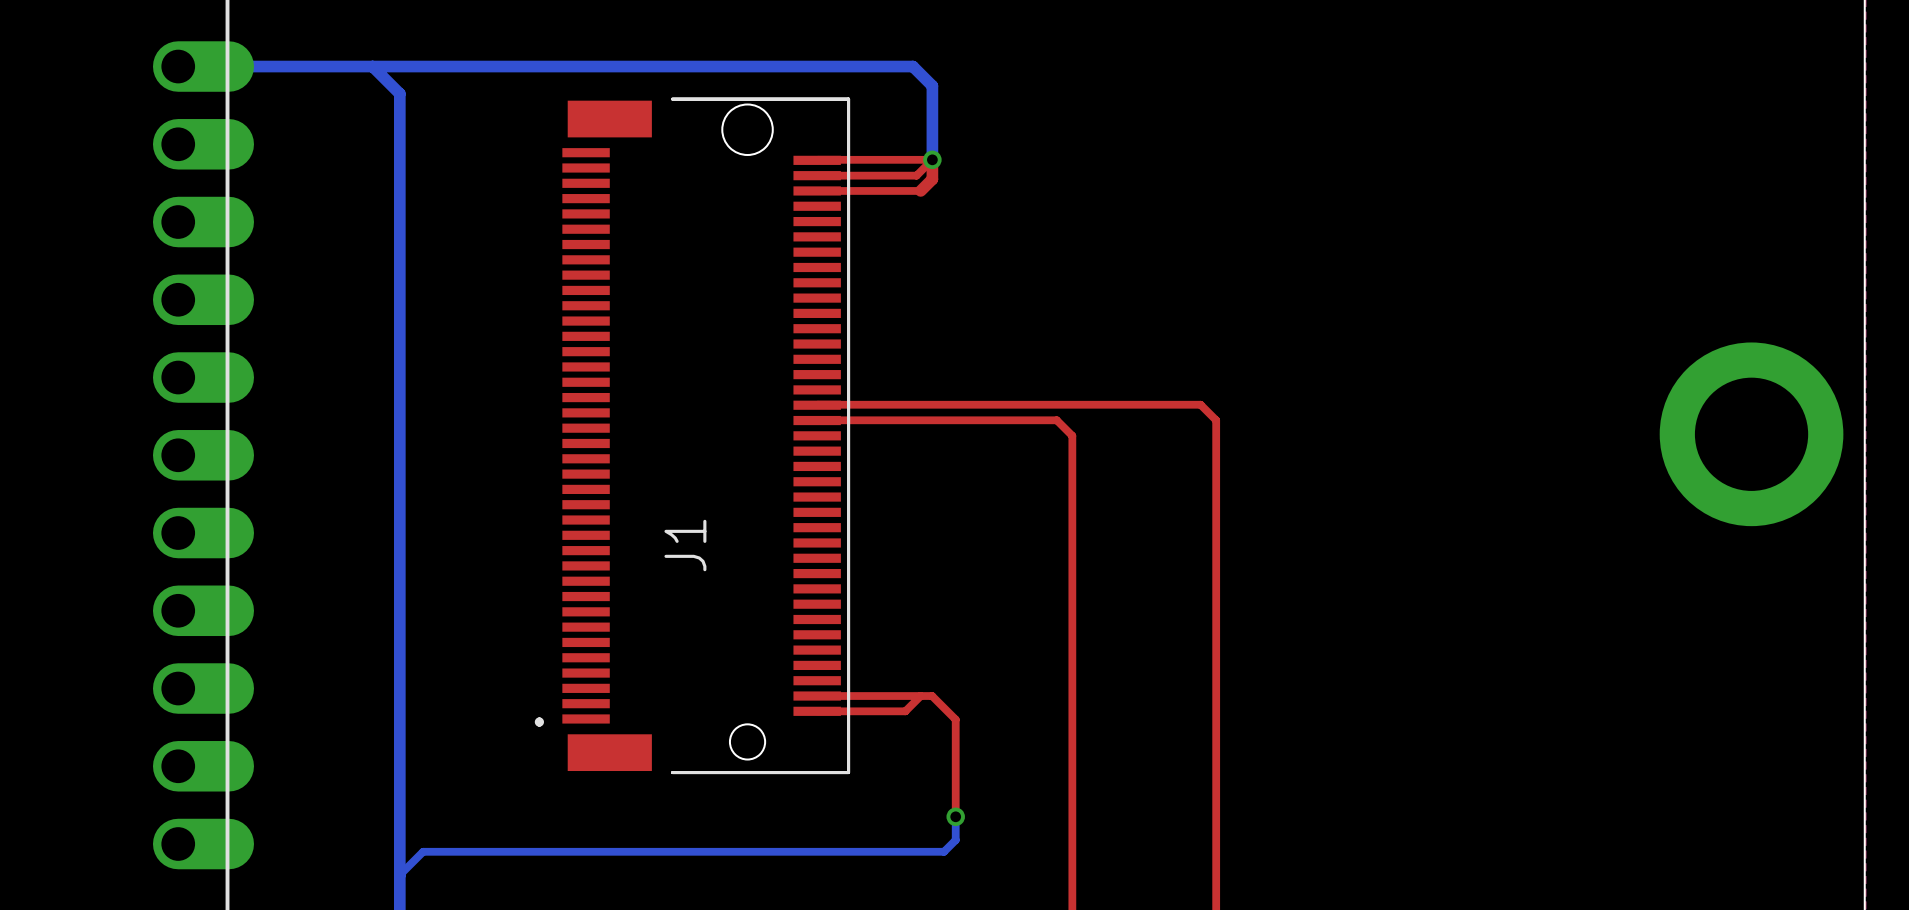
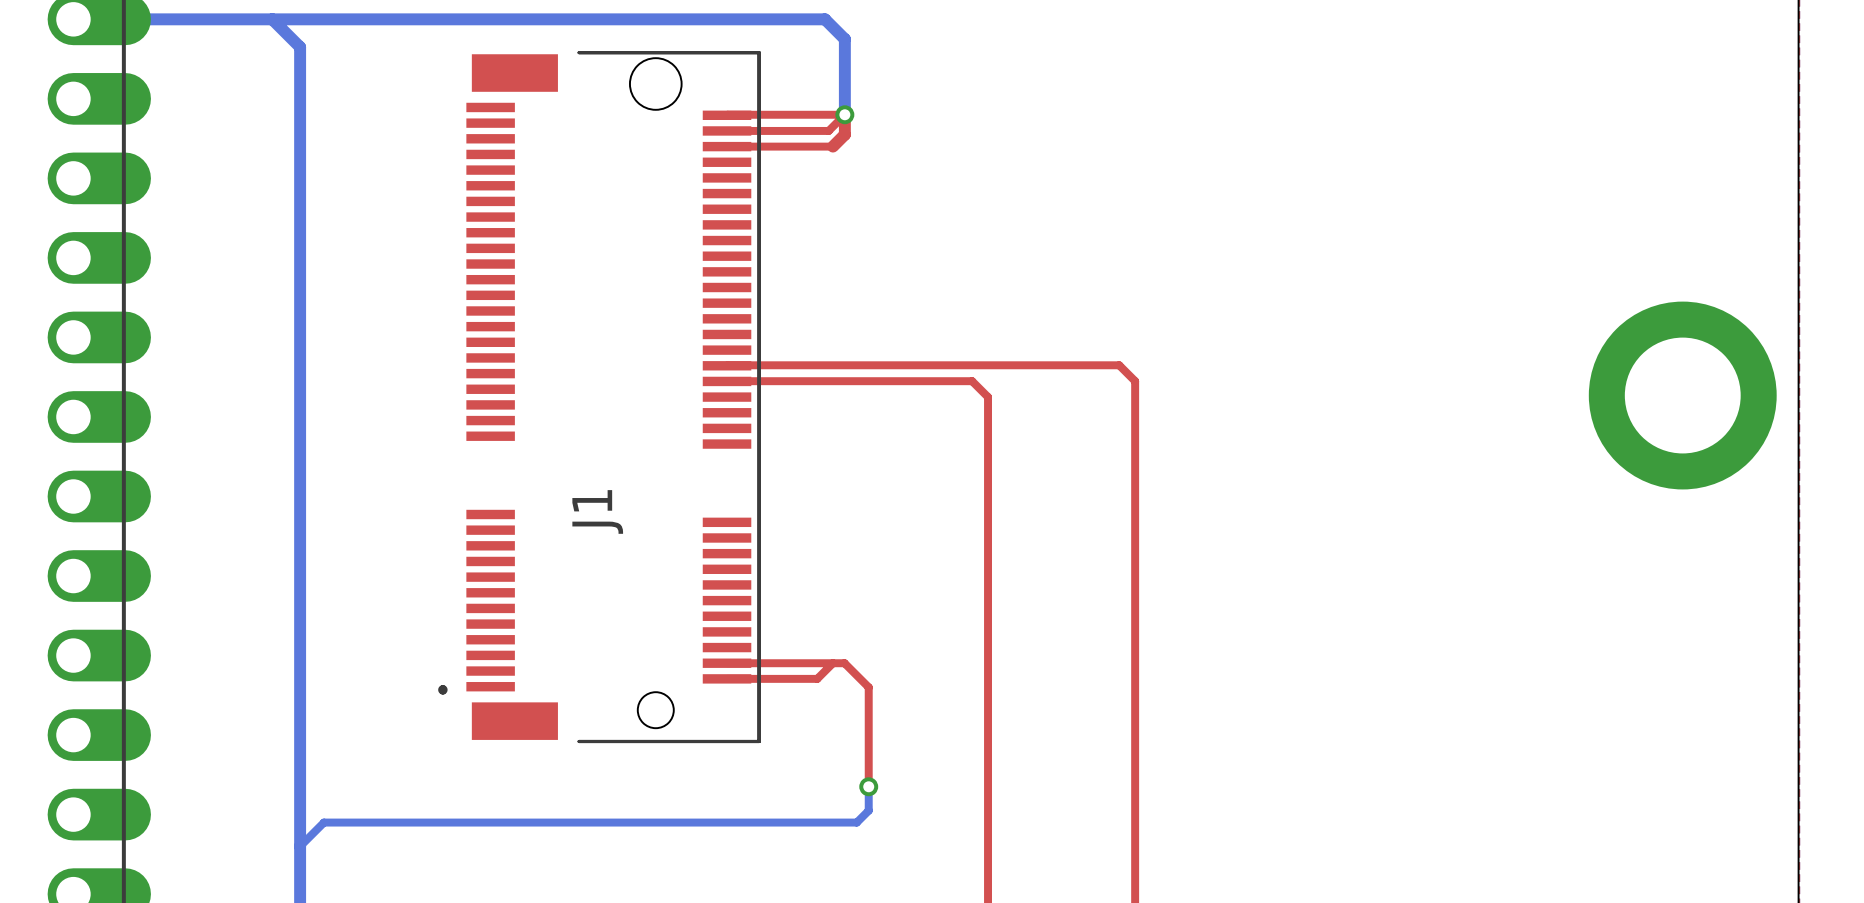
J1 footprint: [534, 97, 1844, 775] -> [438, 51, 1777, 744]

